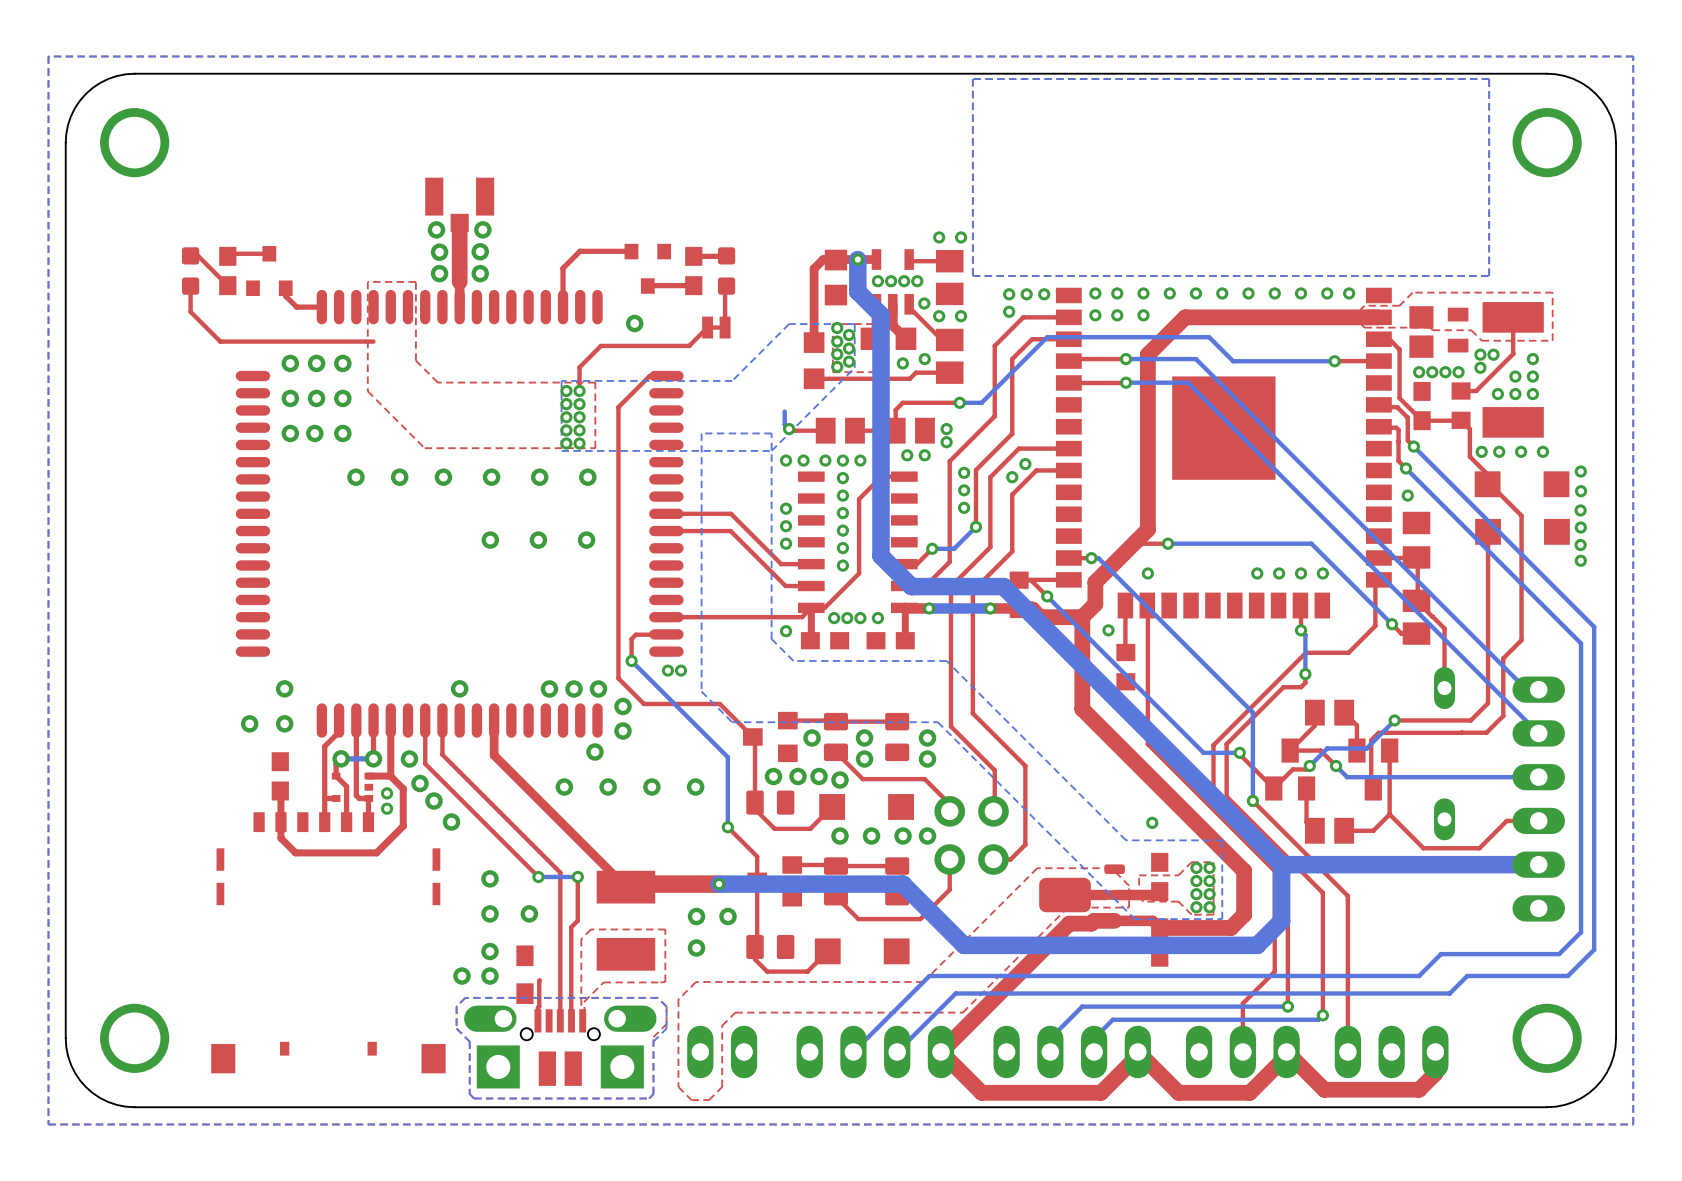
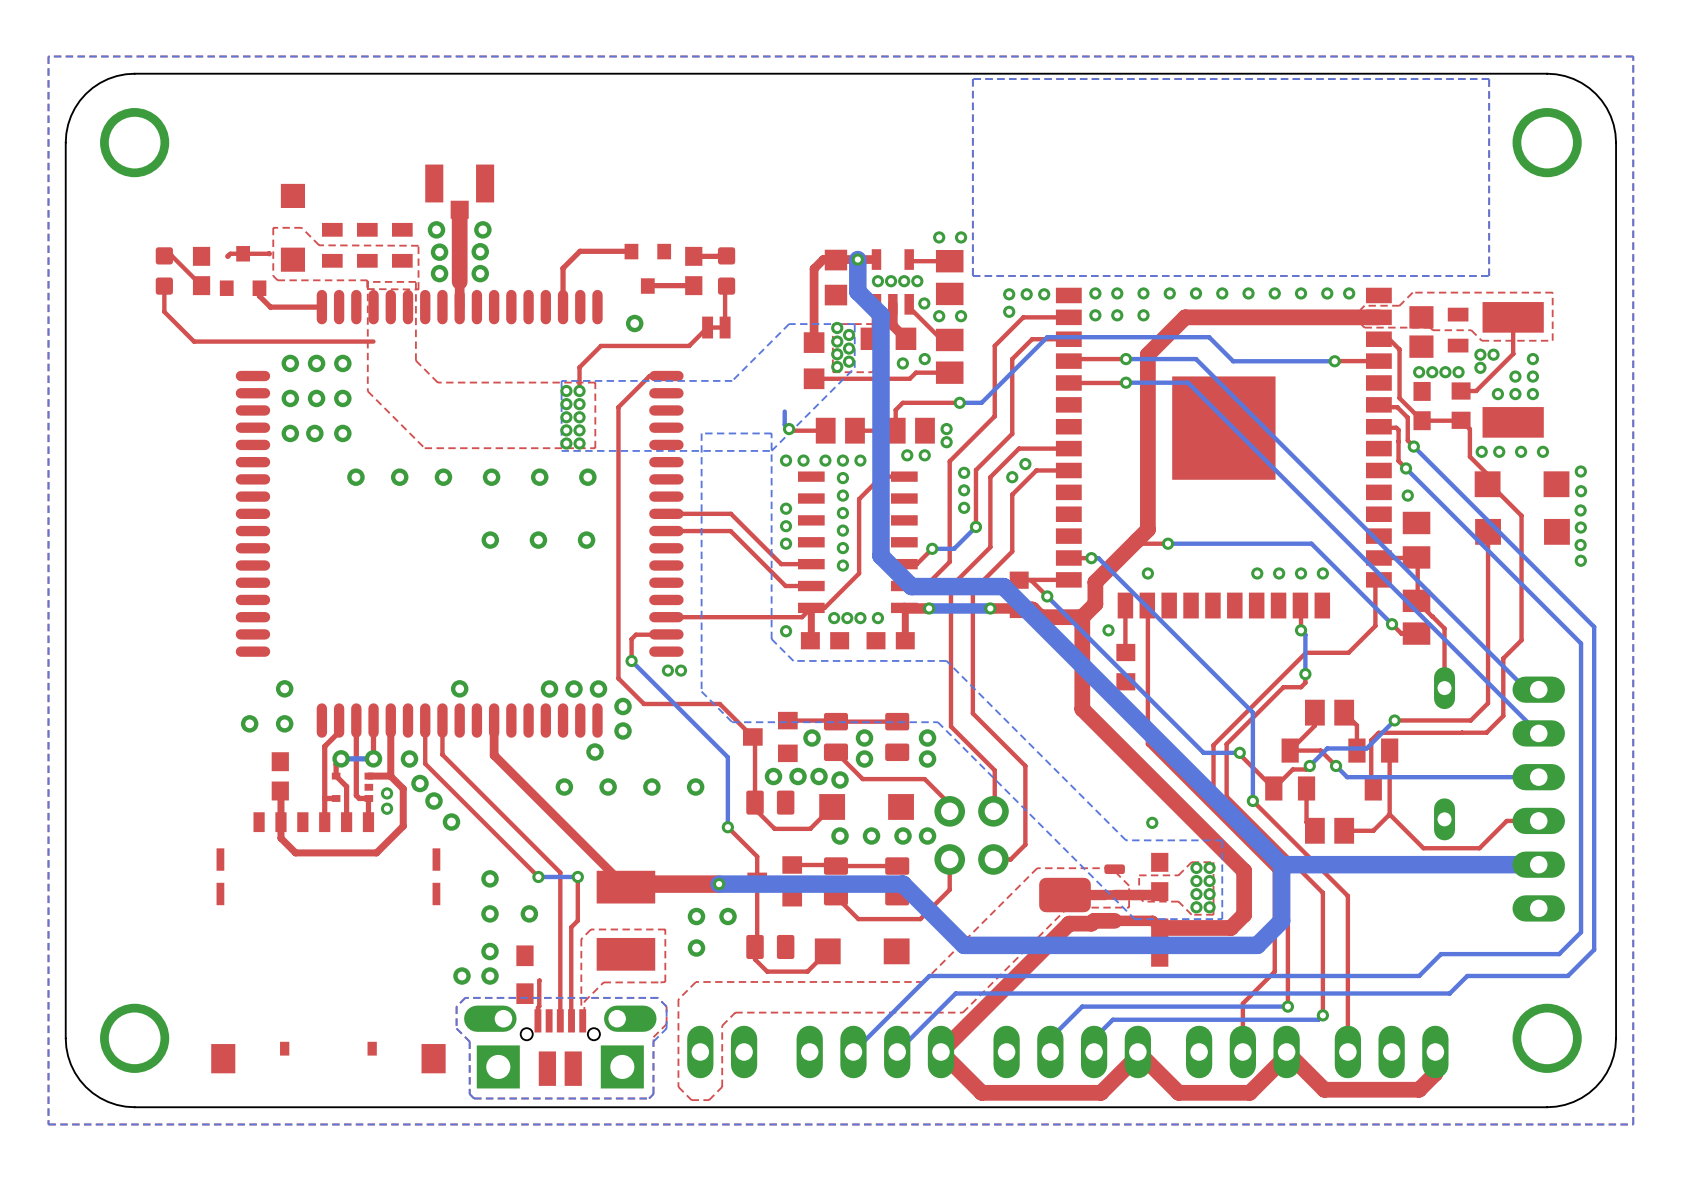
part position: (459, 204) -> (459, 191)
part: none -> (292, 227)
top zone outline: none -> (301, 227) (319, 245) (418, 245) (418, 289) (367, 289) (367, 280) (277, 280) (273, 275) (273, 227) (301, 227)
part: none -> (332, 245)
part: none -> (367, 245)
part: none -> (402, 245)
part footprint: [181, 247, 200, 295] -> [192, 246, 211, 296]
top track: (190, 255) (198, 255) (227, 284) -> (164, 255) (171, 255) (201, 284)
part: none -> (164, 270)
part: (227, 270) -> none
part position: (269, 270) -> (243, 270)
top track: (190, 286) (190, 311) (220, 341) -> (164, 286) (164, 311) (194, 341) (220, 341)
top track: (285, 288) (285, 296) (296, 307) -> (259, 288) (259, 296) (270, 307) (296, 307)

